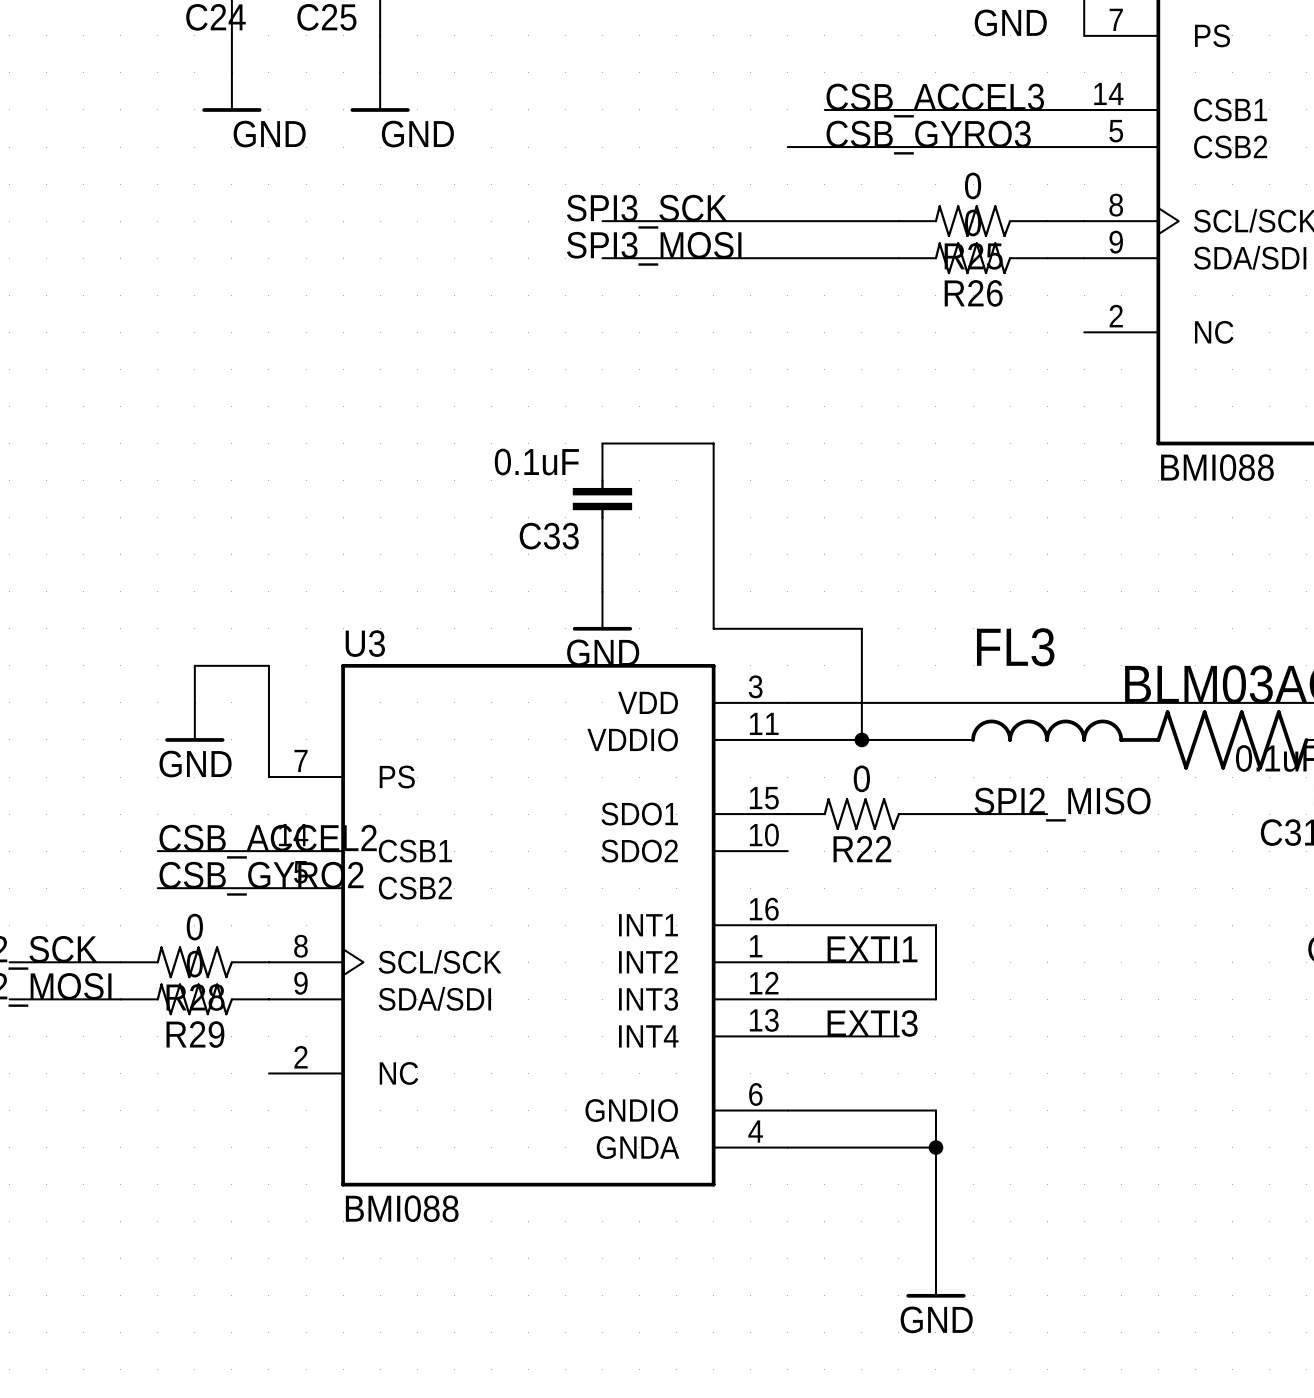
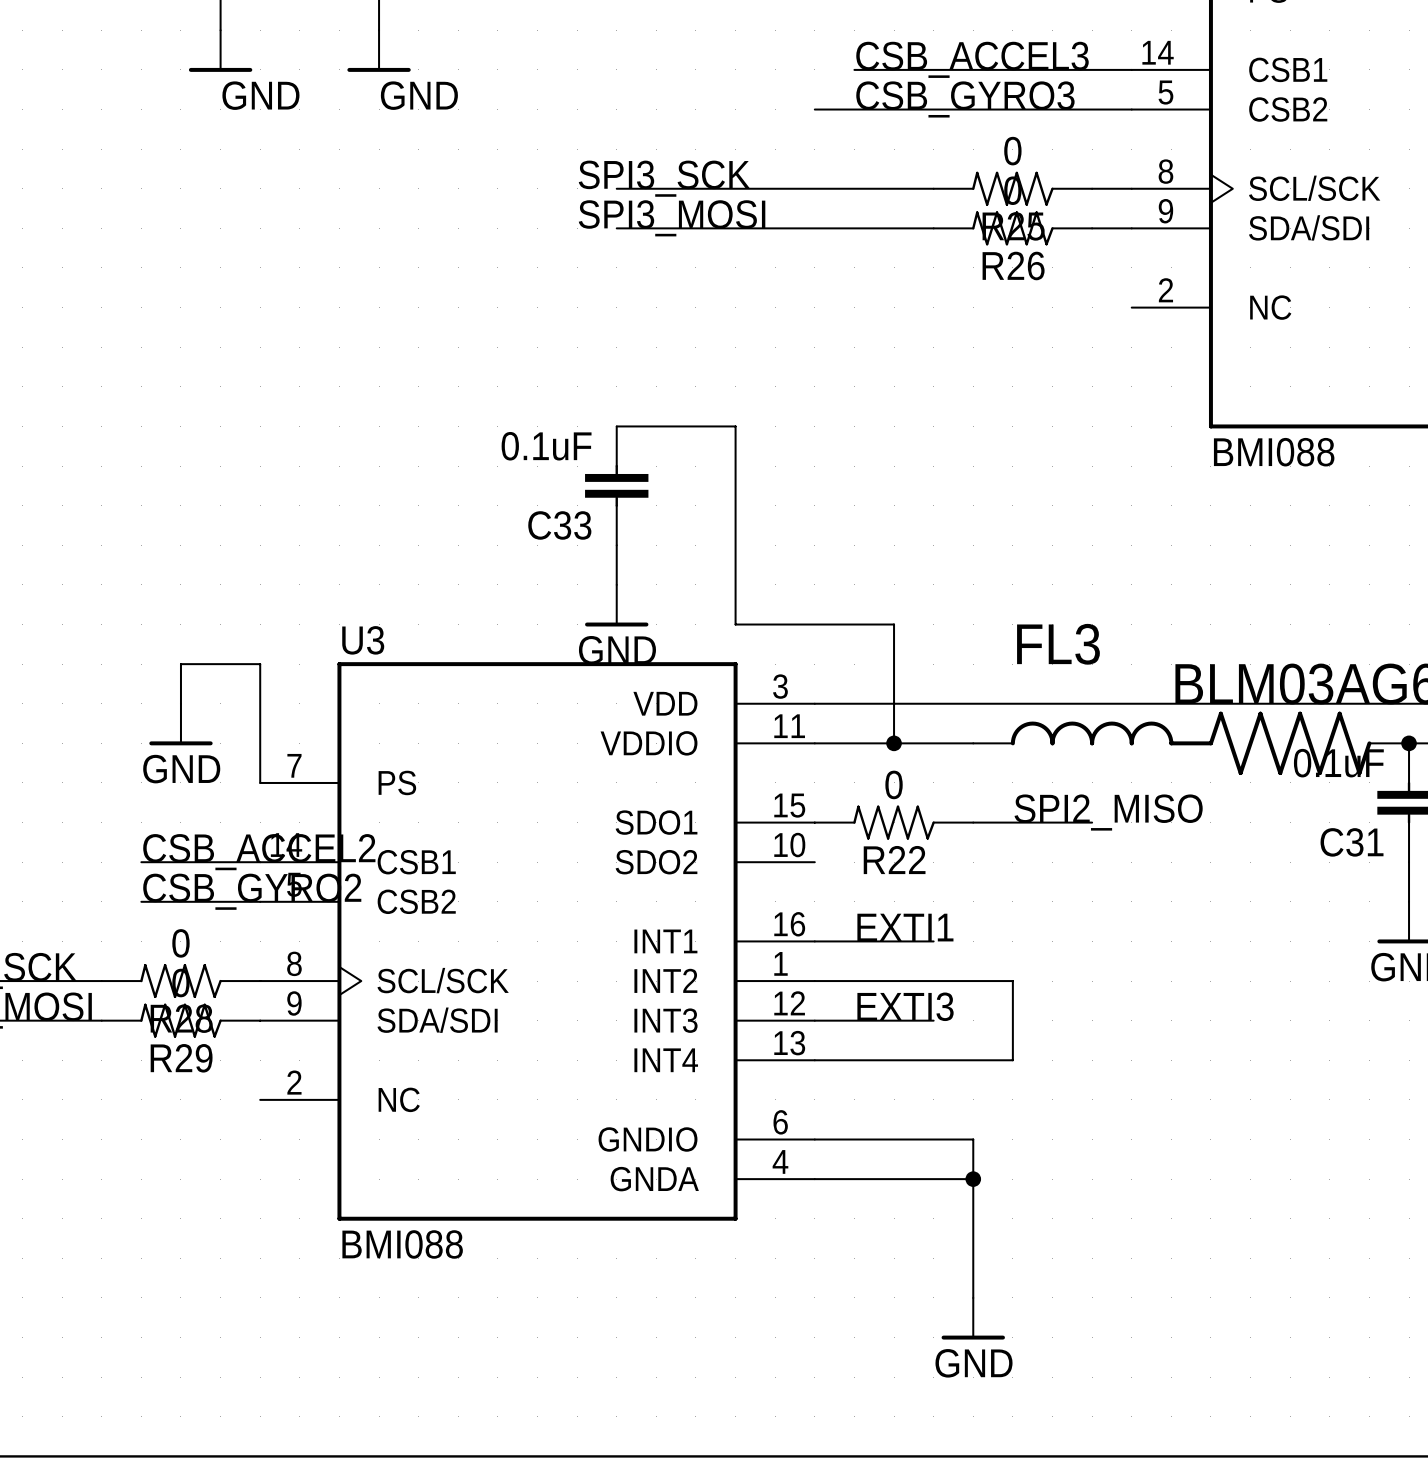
wire: (898, 925) (935, 925) (935, 999) (898, 999) -> none
label position: EXTI1 (872, 949) -> EXTI1 (905, 927)
wire: none -> (933, 981) (1012, 981) (1012, 1060) (933, 1060)
label position: EXTI3 (872, 1023) -> EXTI3 (905, 1006)

